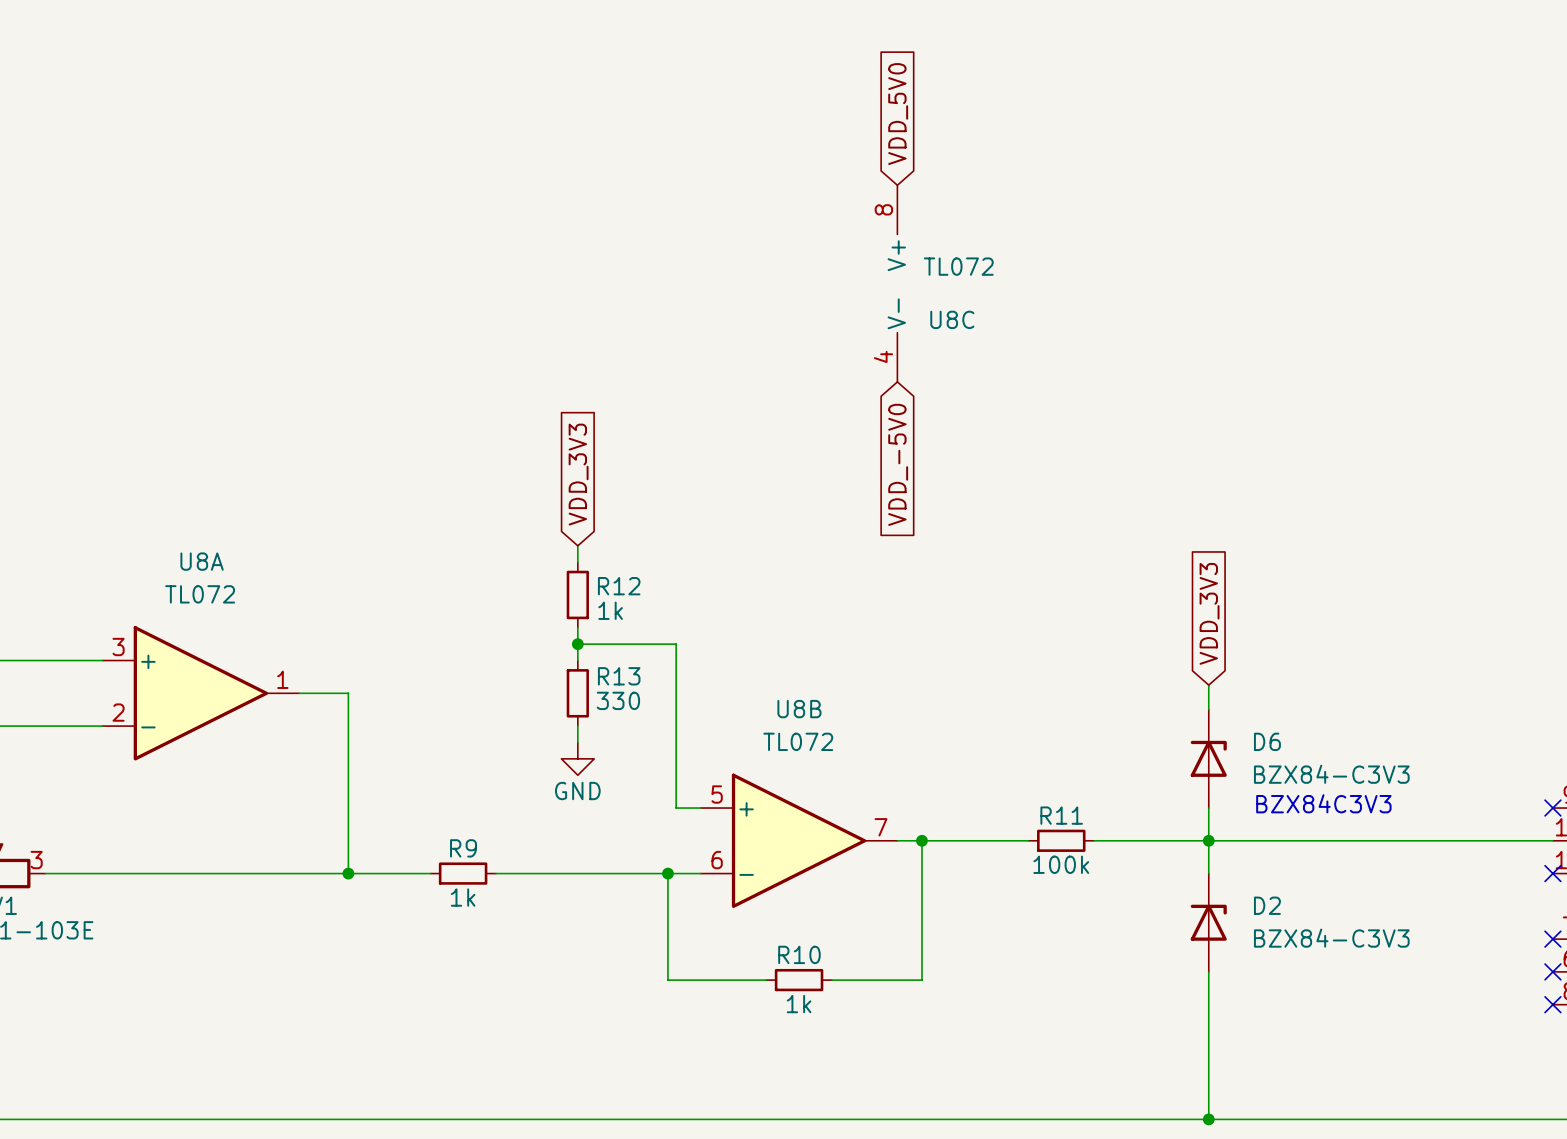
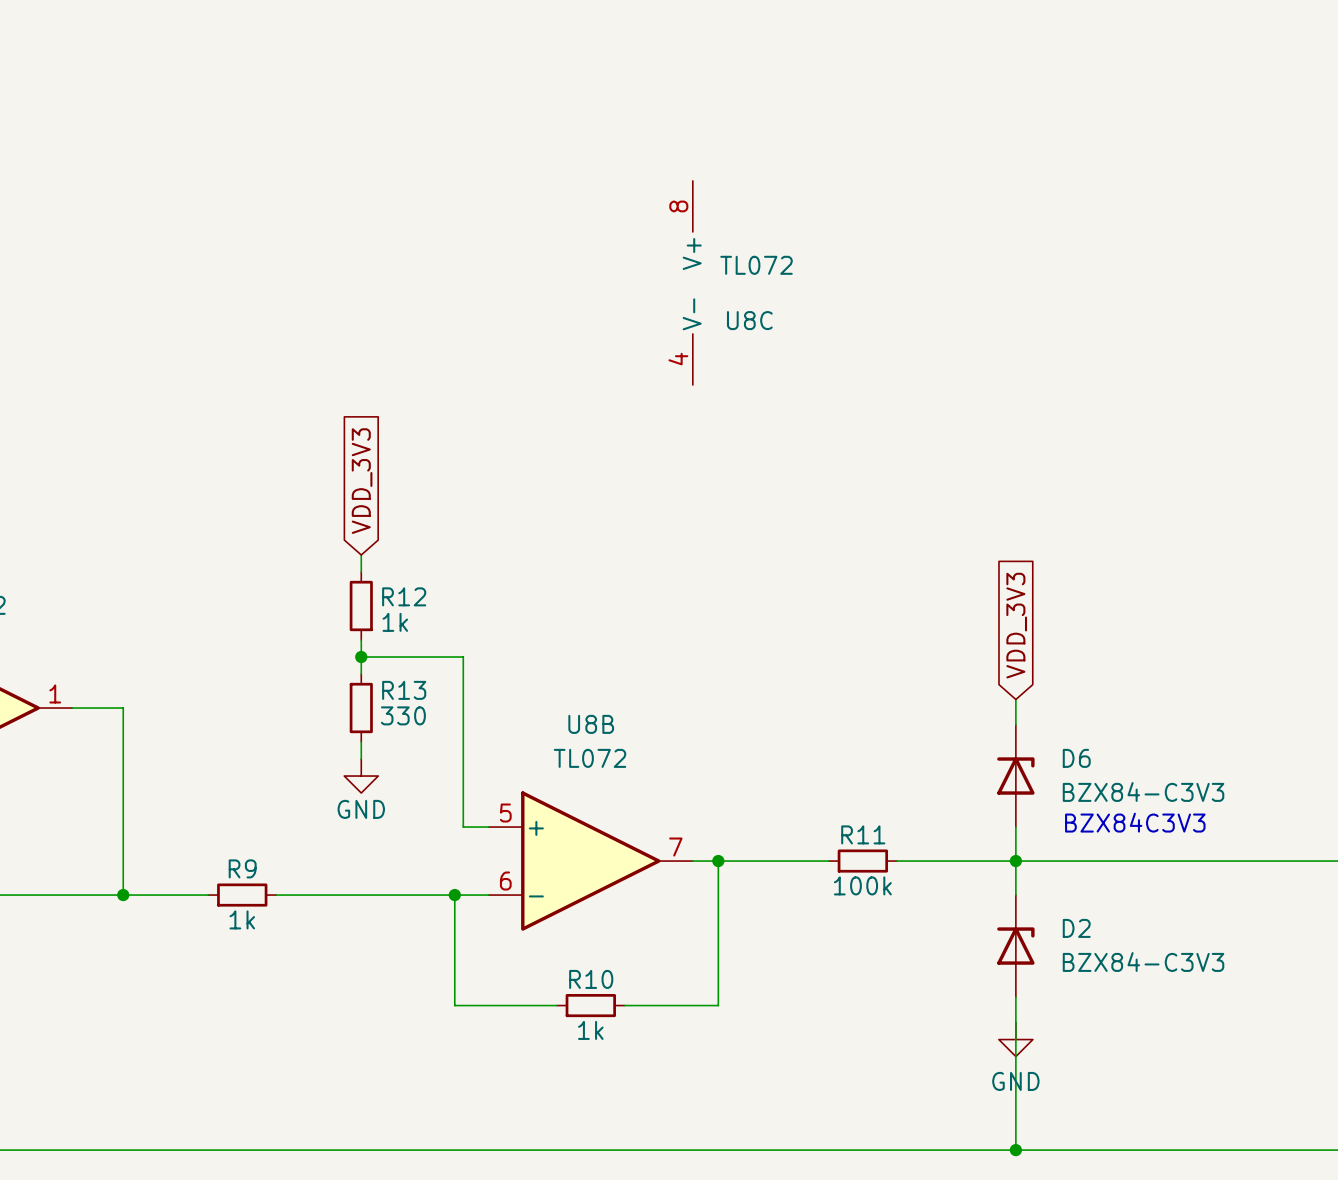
global label: VDD_5V0 (898, 114) -> none
global label: VDD_-5V0 (898, 464) -> none
power symbol: none -> GND (1015, 1039)

